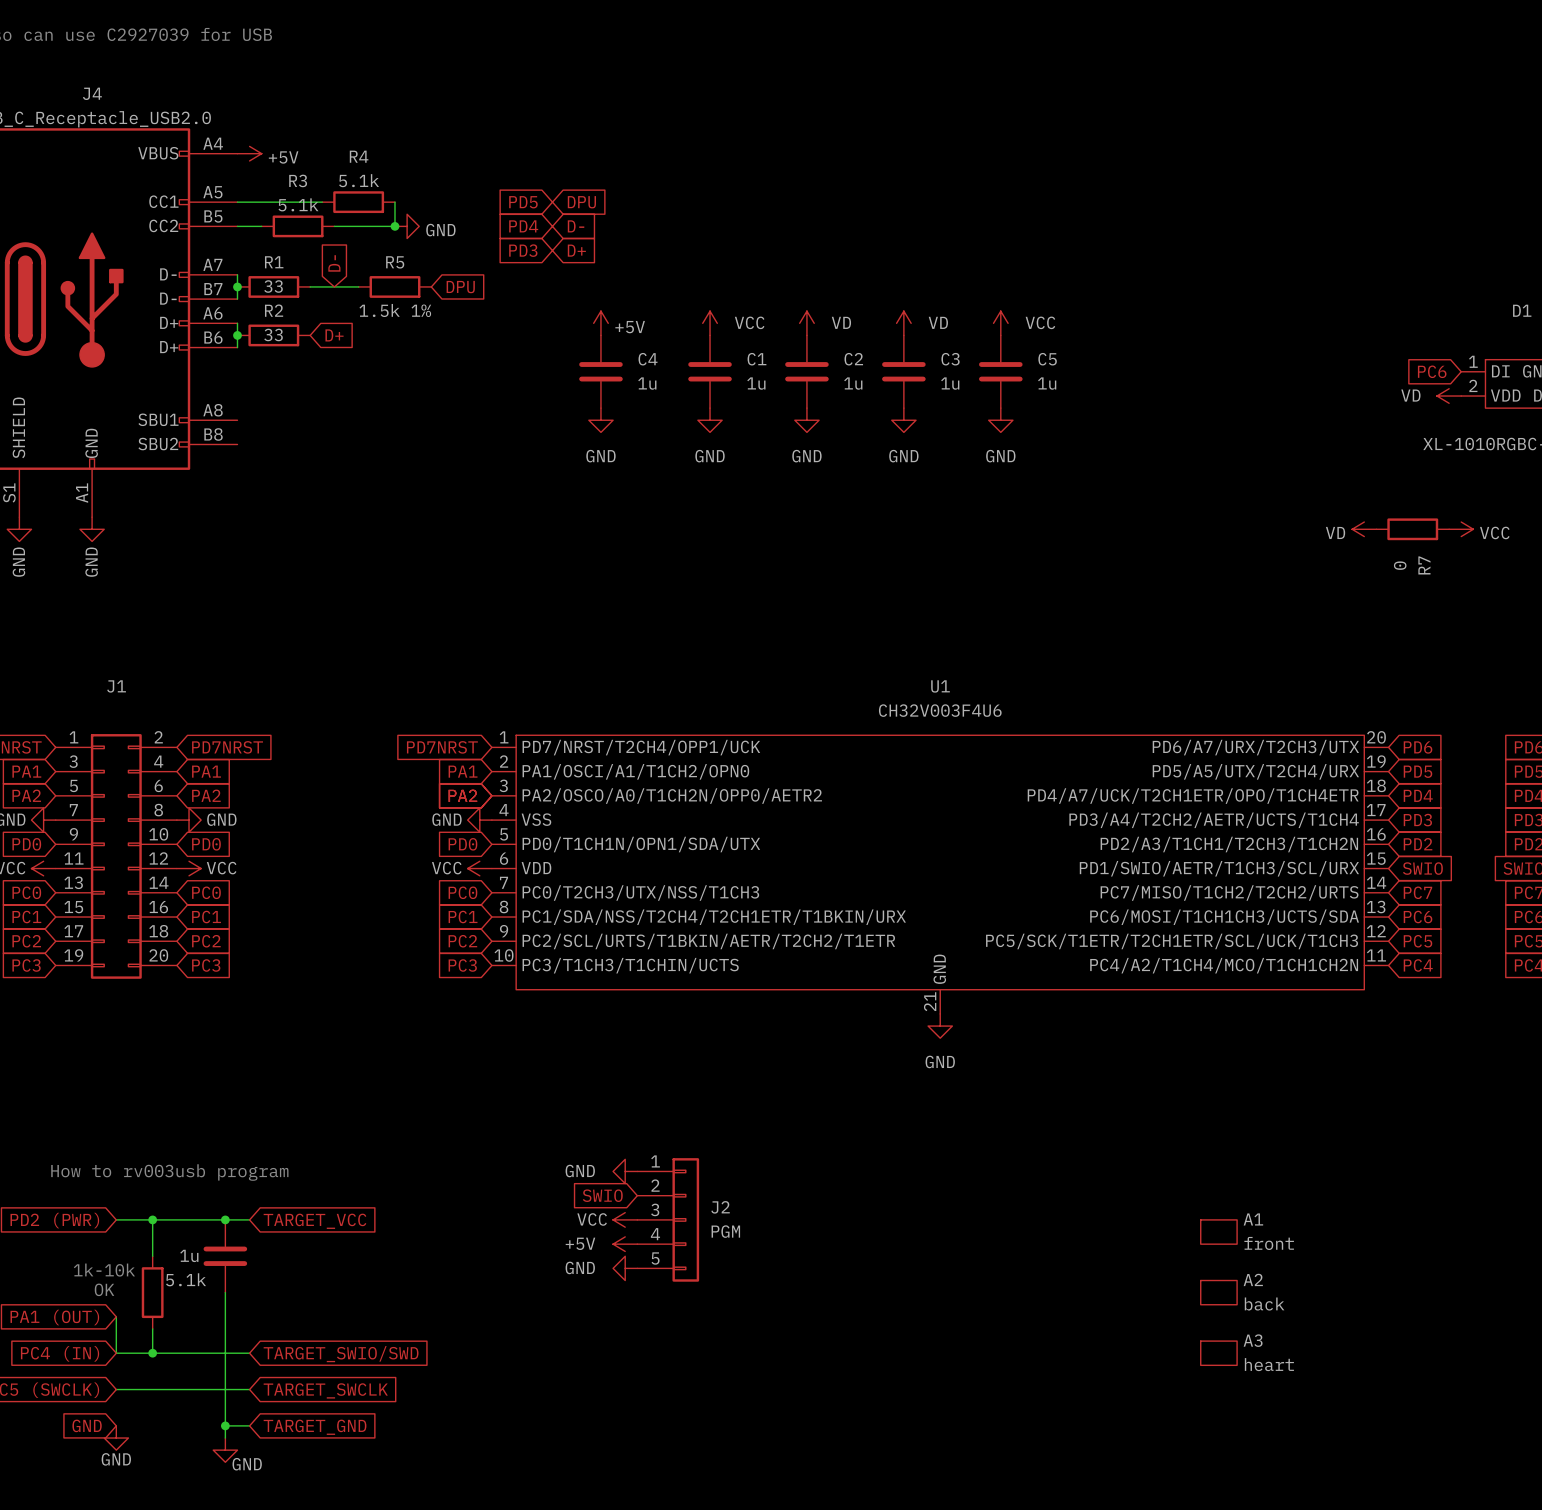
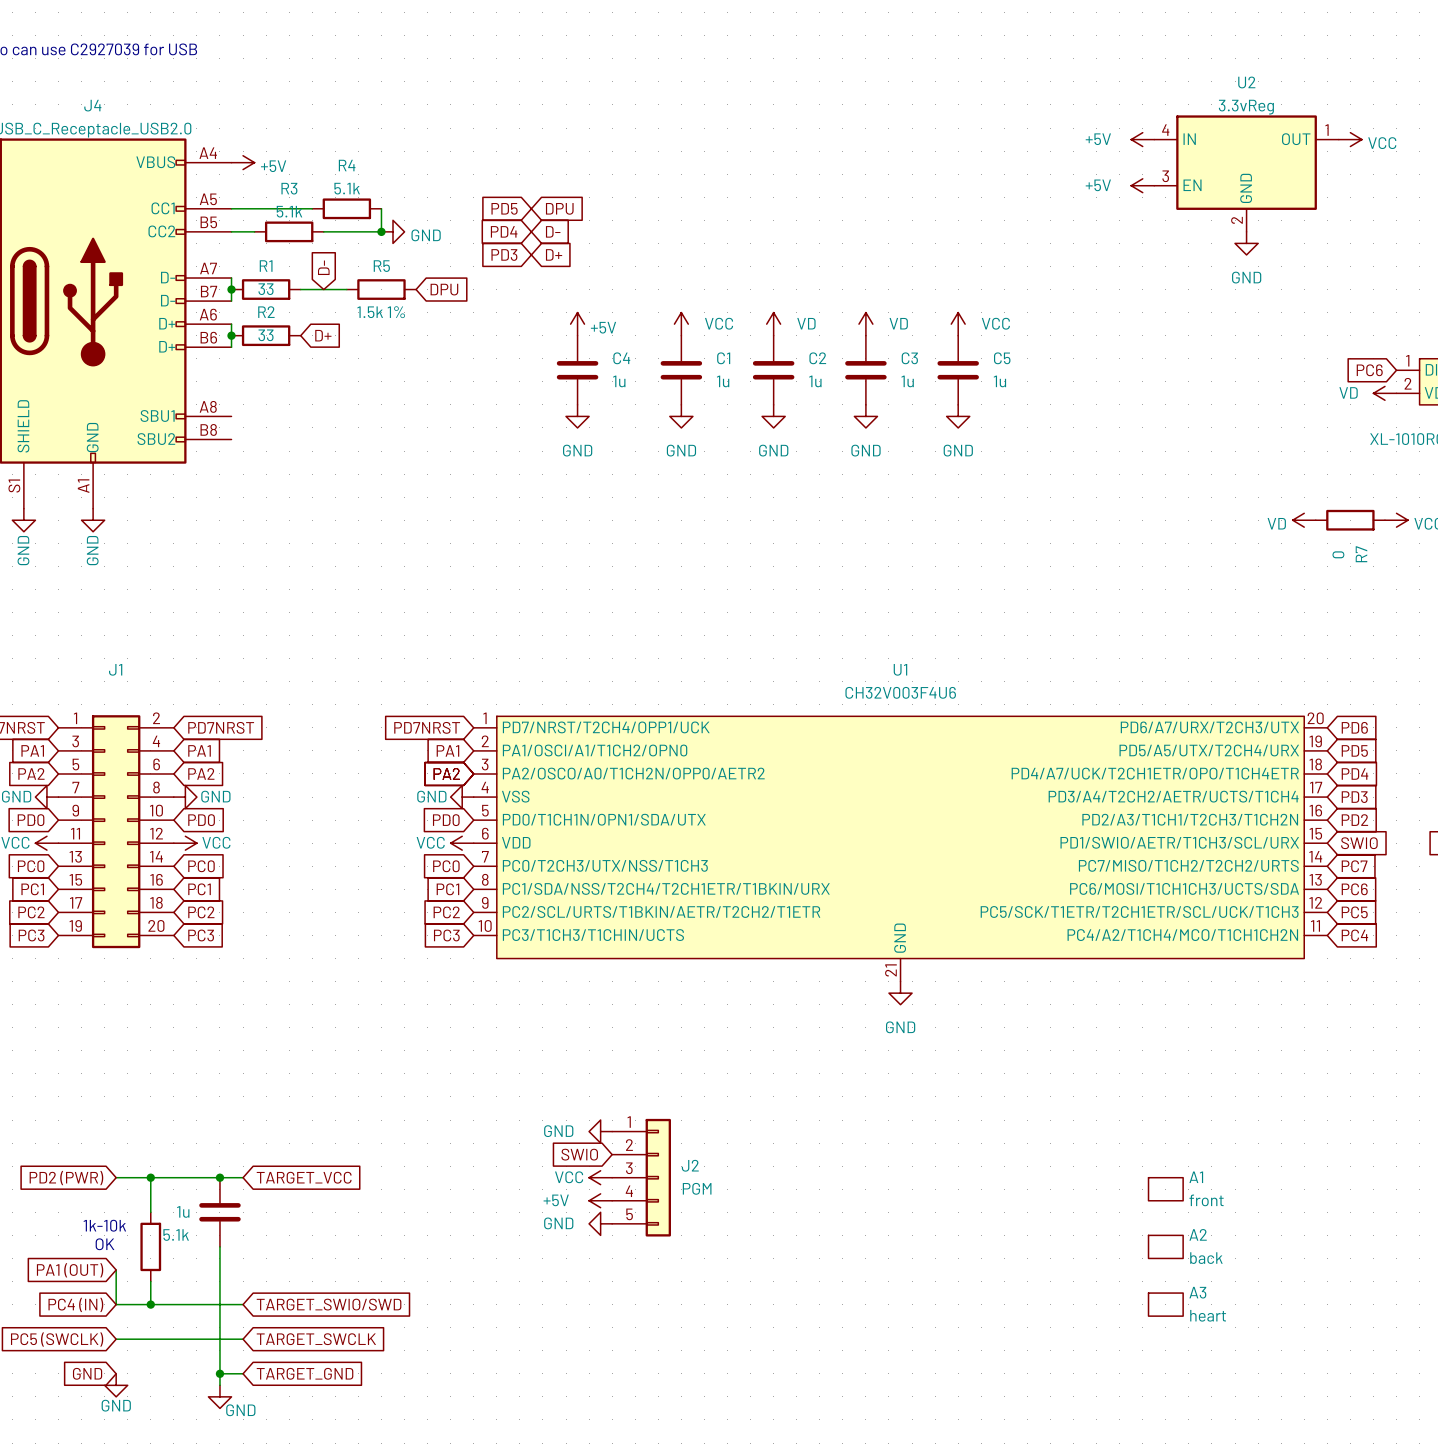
power symbol: none -> +5V (1142, 139)
power symbol: none -> VCC (1350, 139)
U2: none -> 3.3vReg (1246, 173)
power symbol: none -> +5V (1142, 185)
power symbol: none -> GND (1246, 243)
text: How to rv003usb program (169, 1172) -> none

